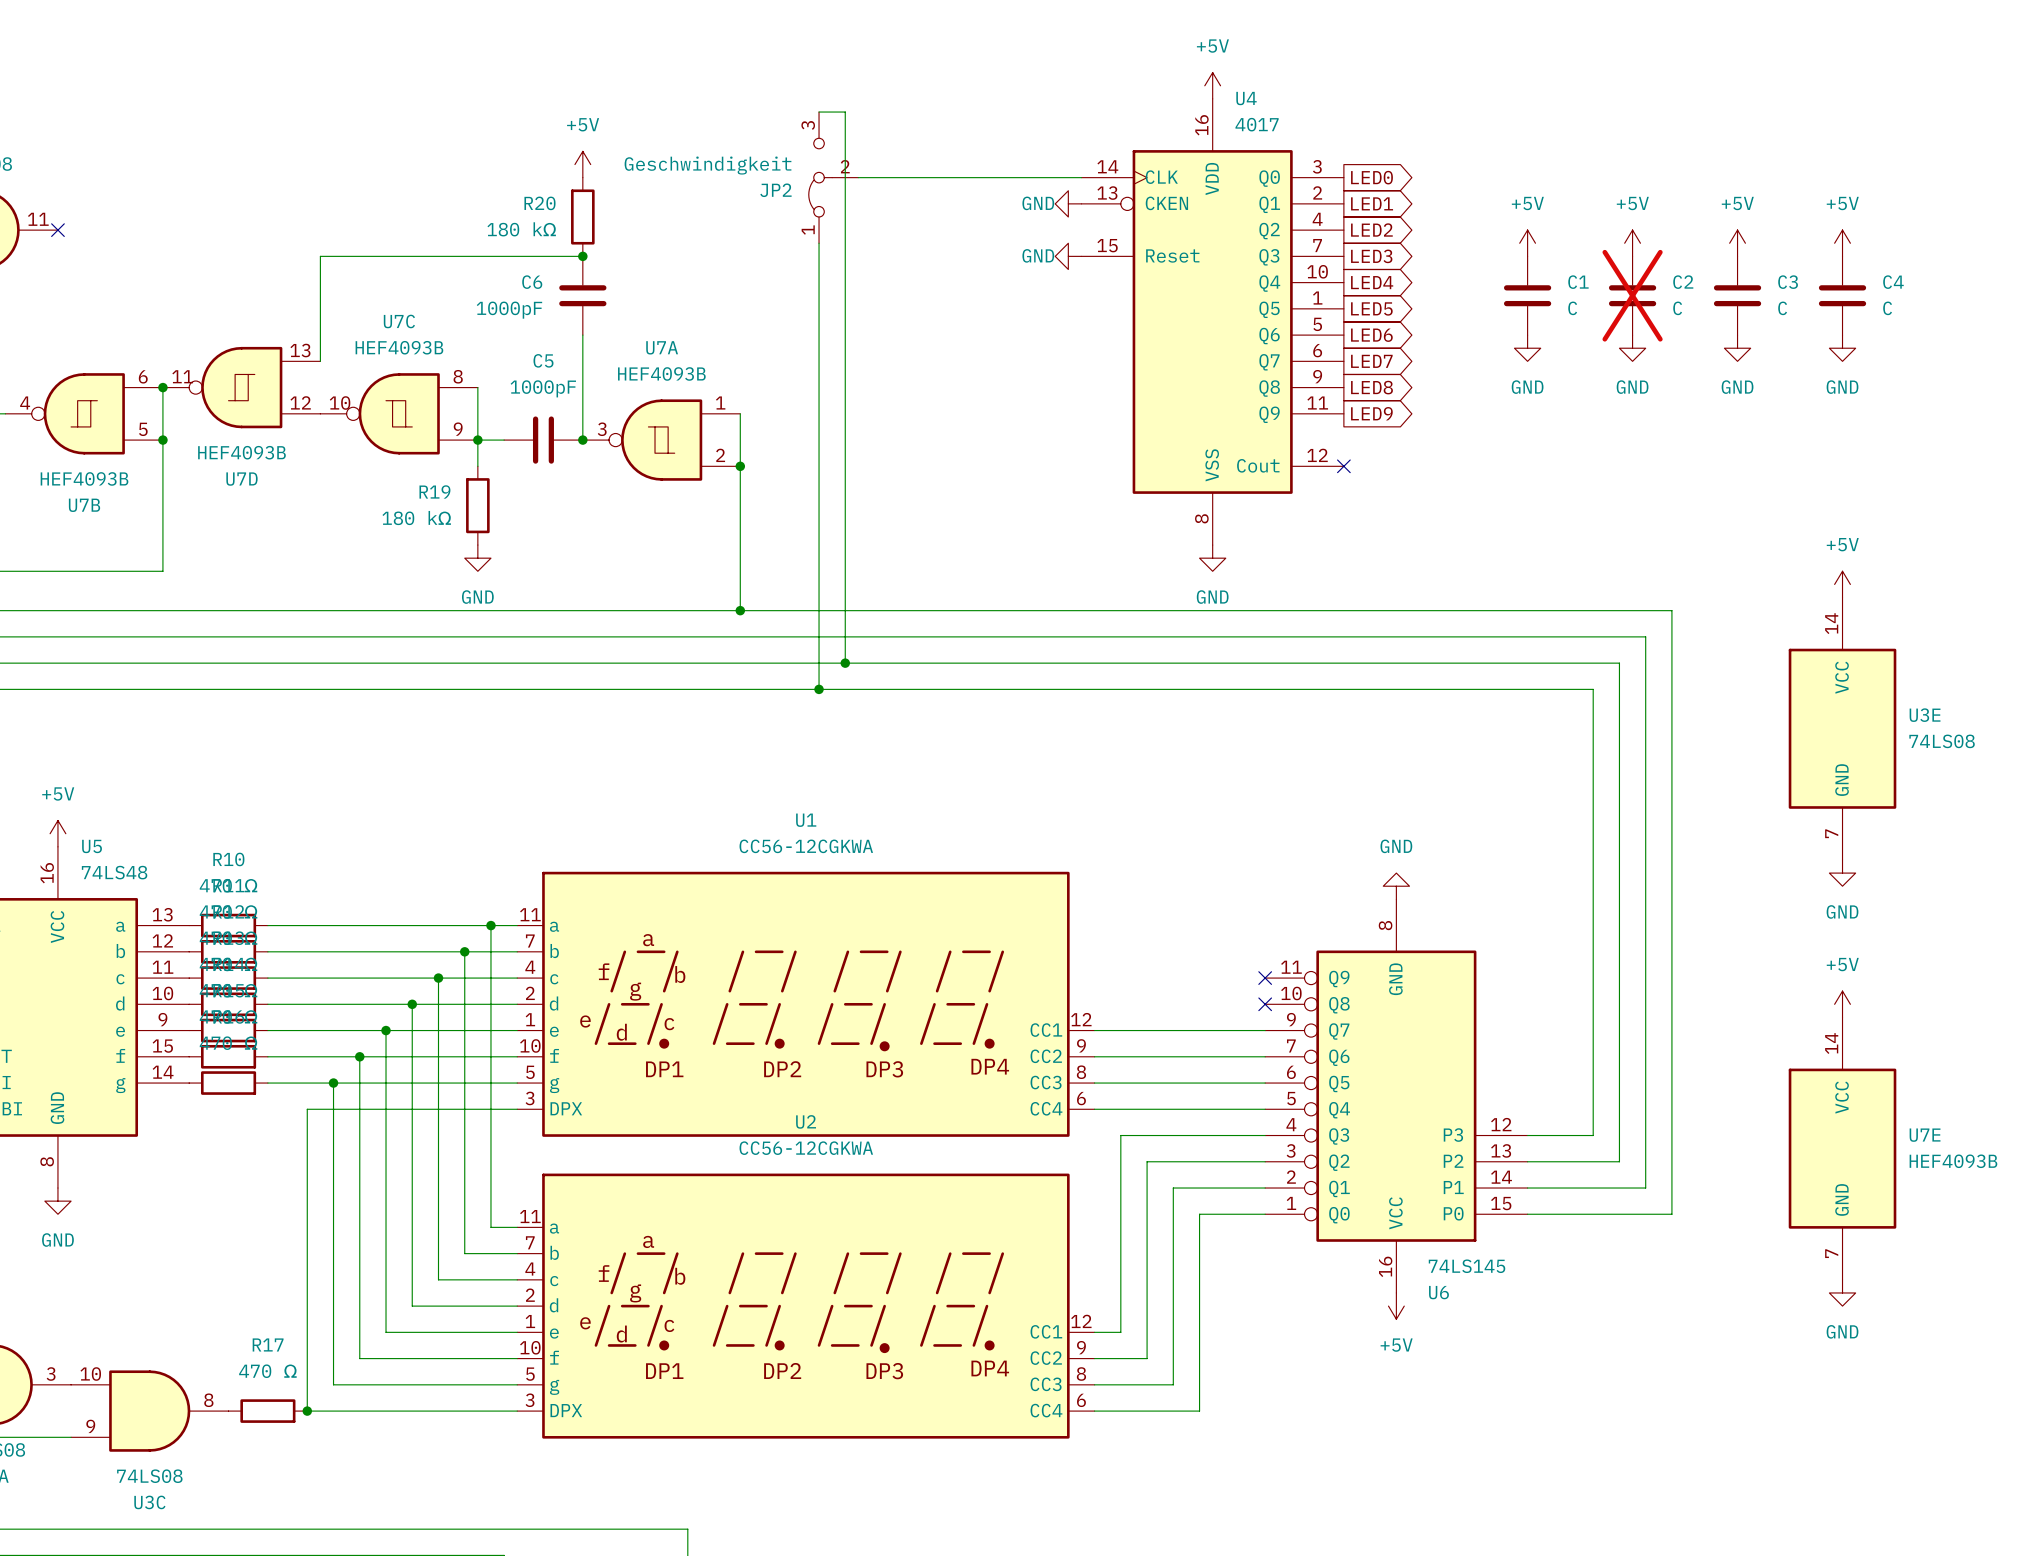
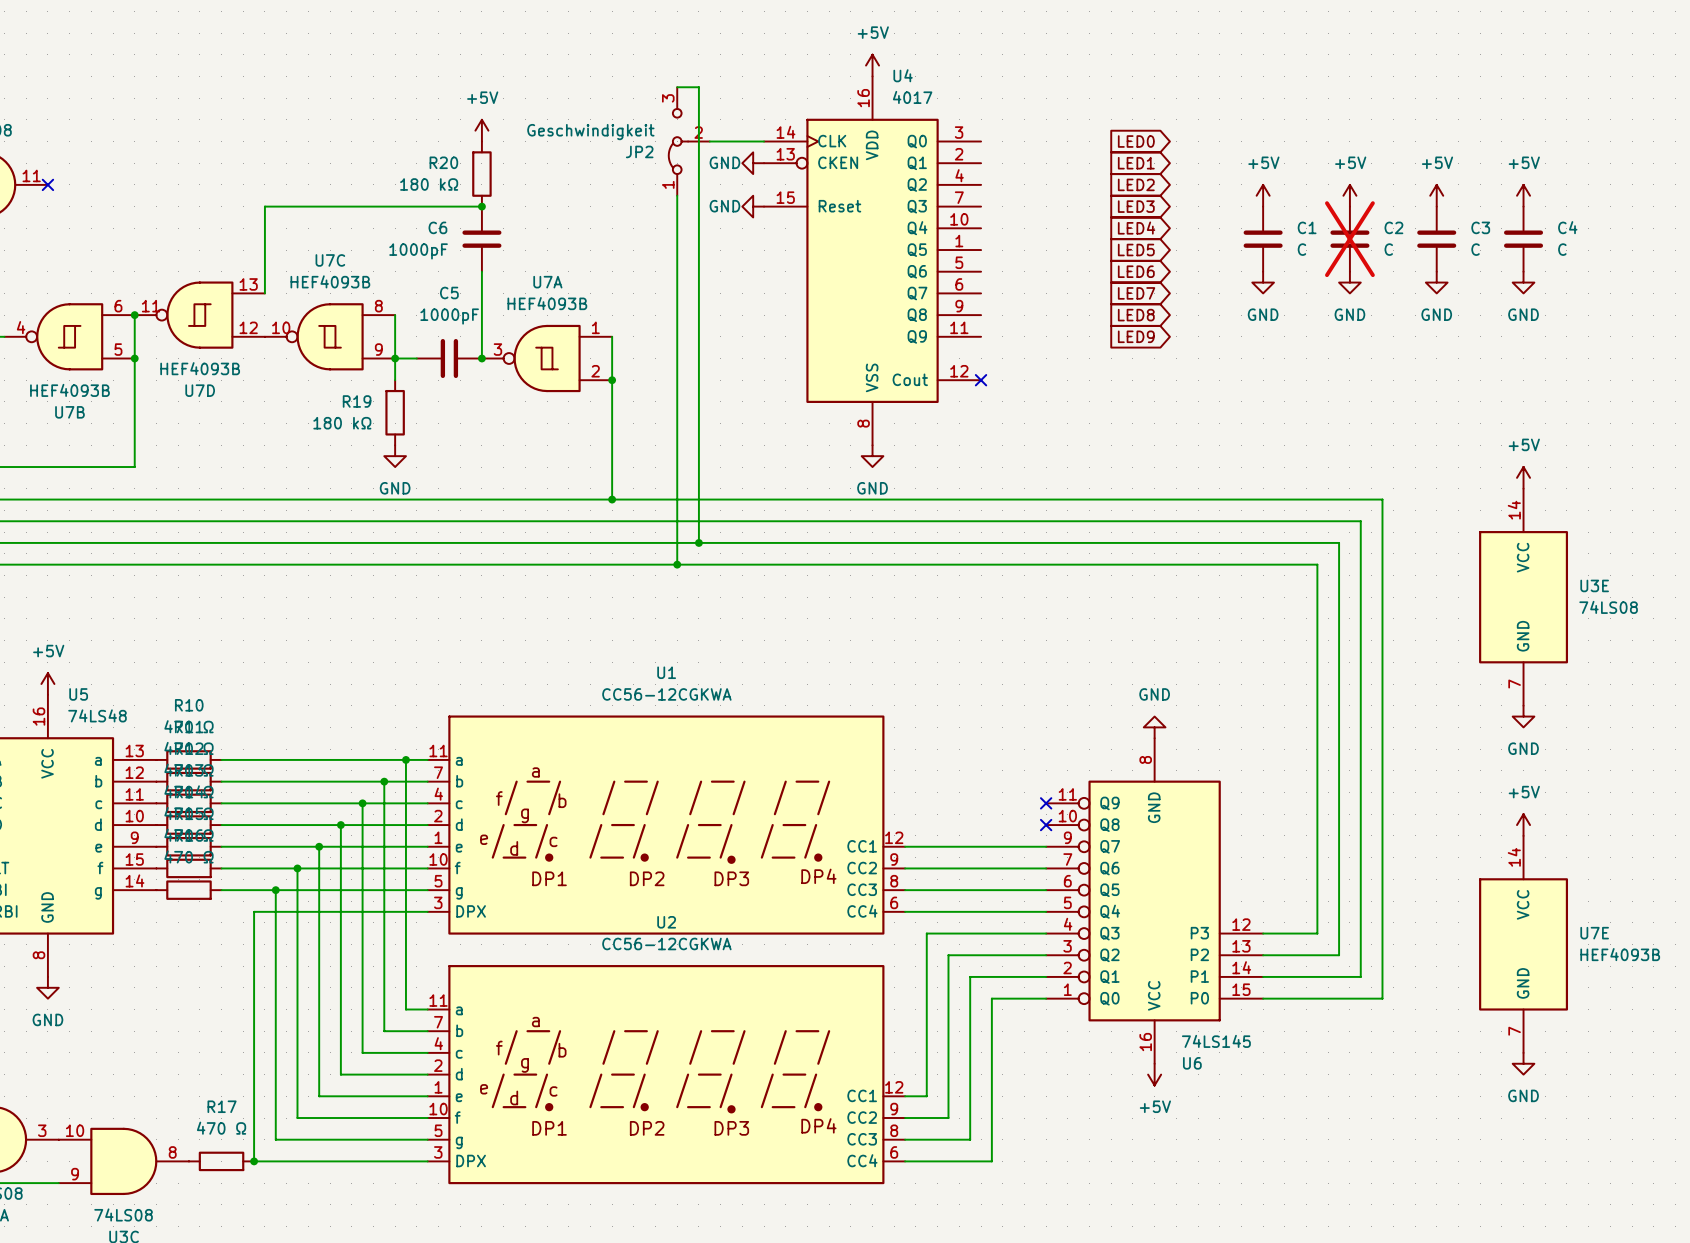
power symbol position: +5V (1212, 85) -> +5V (872, 65)
power symbol: none -> GND (753, 163)
power symbol: GND (1068, 203) -> none
power symbol: none -> GND (753, 206)
power symbol: GND (1068, 256) -> none
U4 position: (1212, 321) -> (872, 260)
no-connect mark: none -> (981, 380)
no-connect mark: (1343, 466) -> none
power symbol: none -> GND (872, 456)
power symbol: GND (1212, 558) -> none

